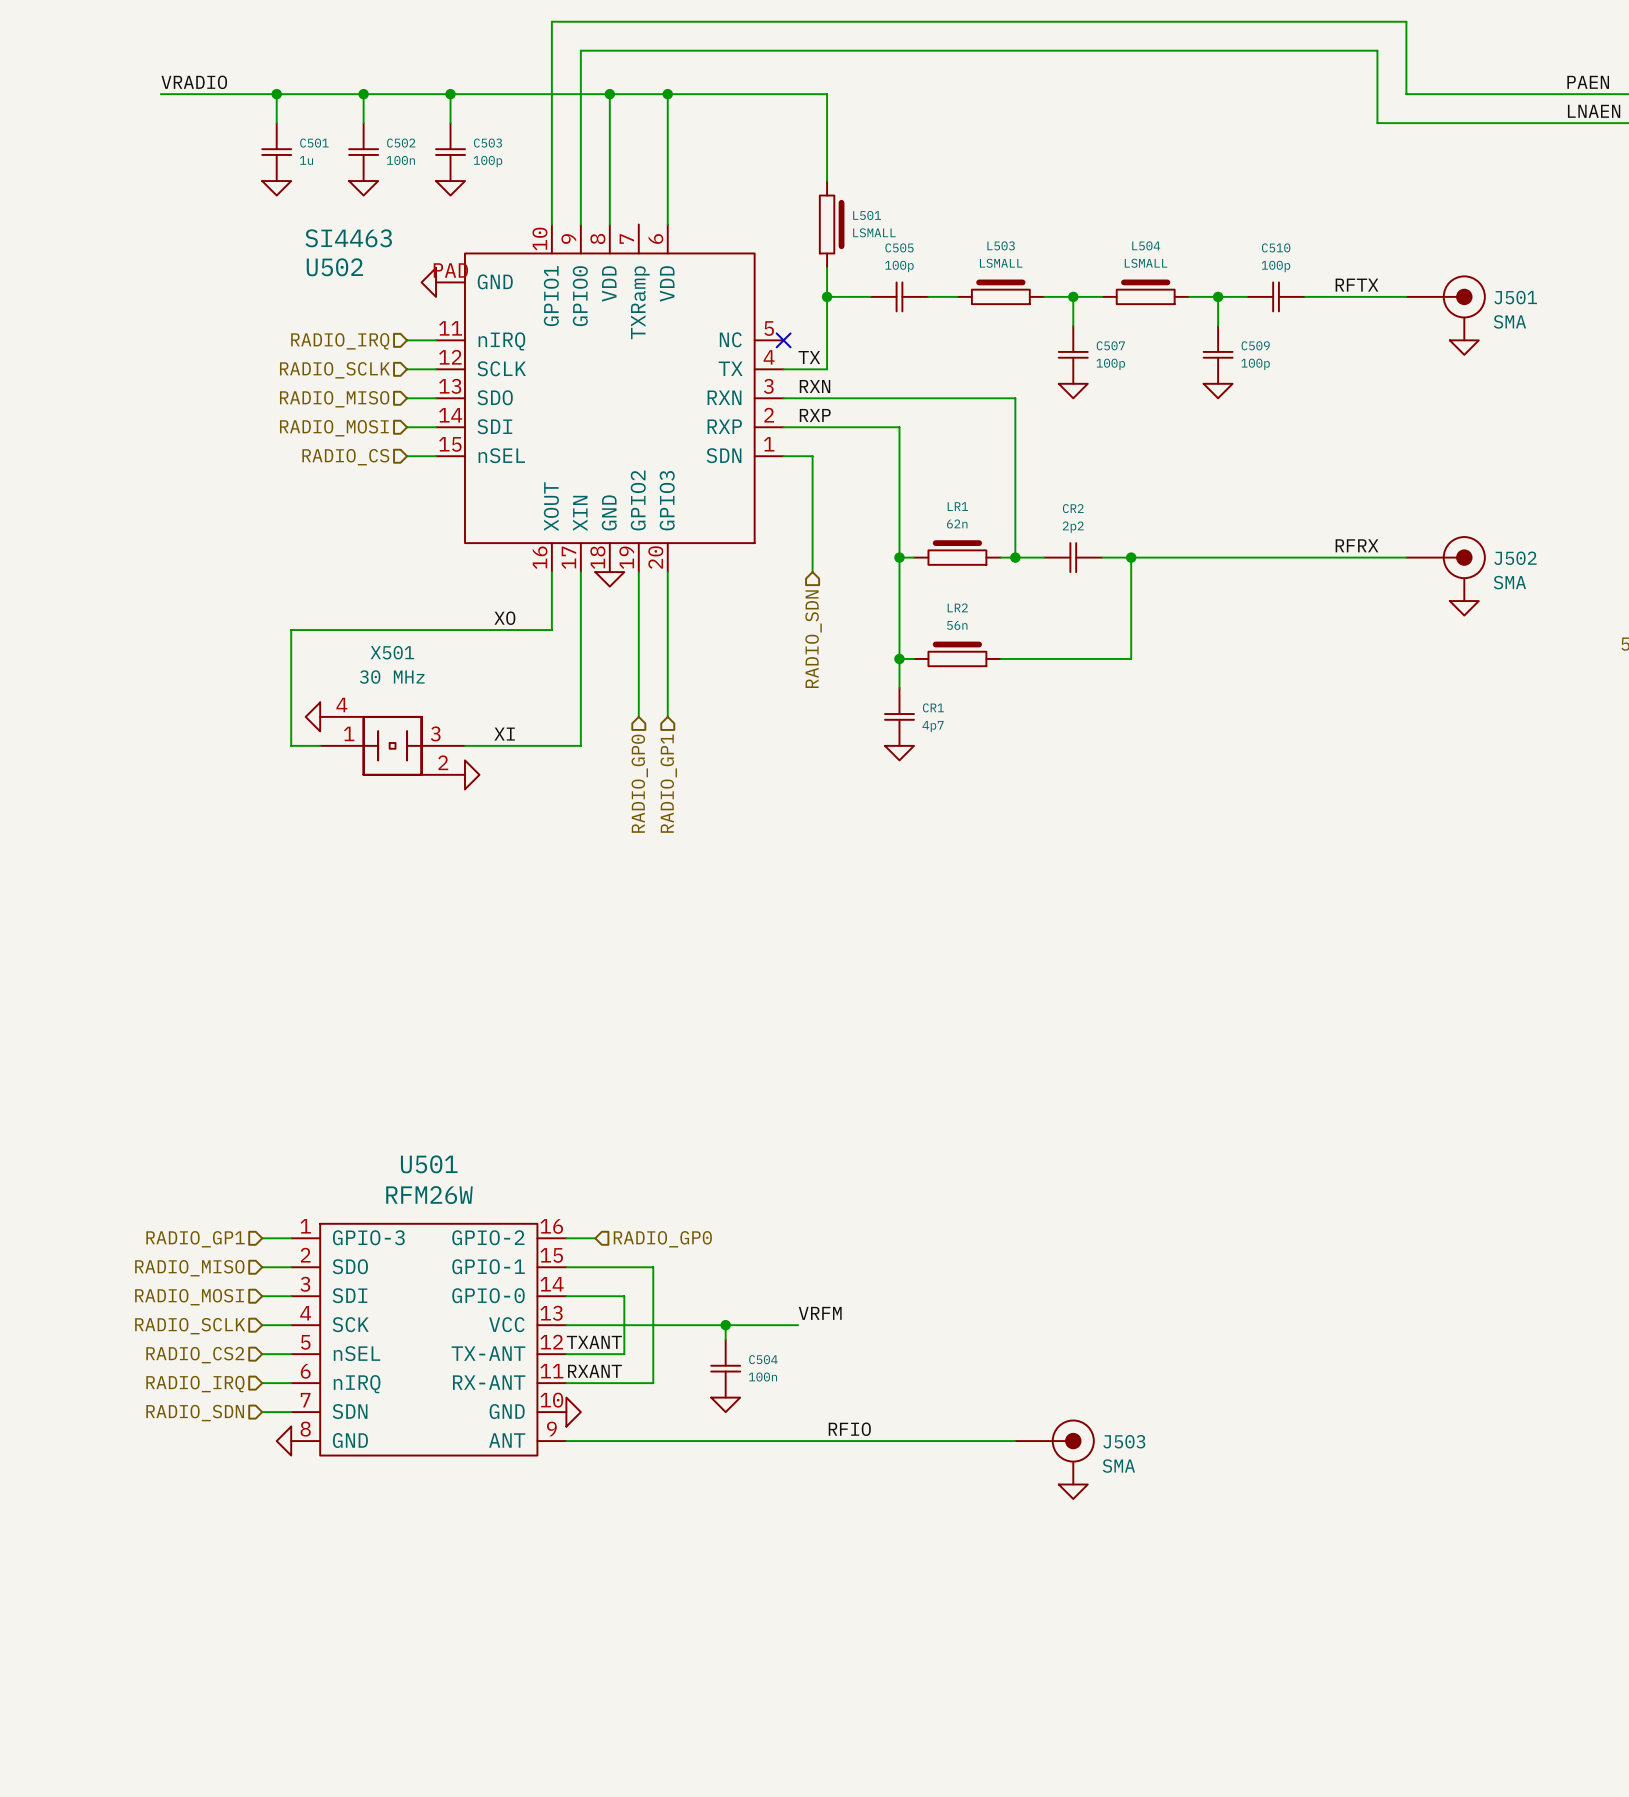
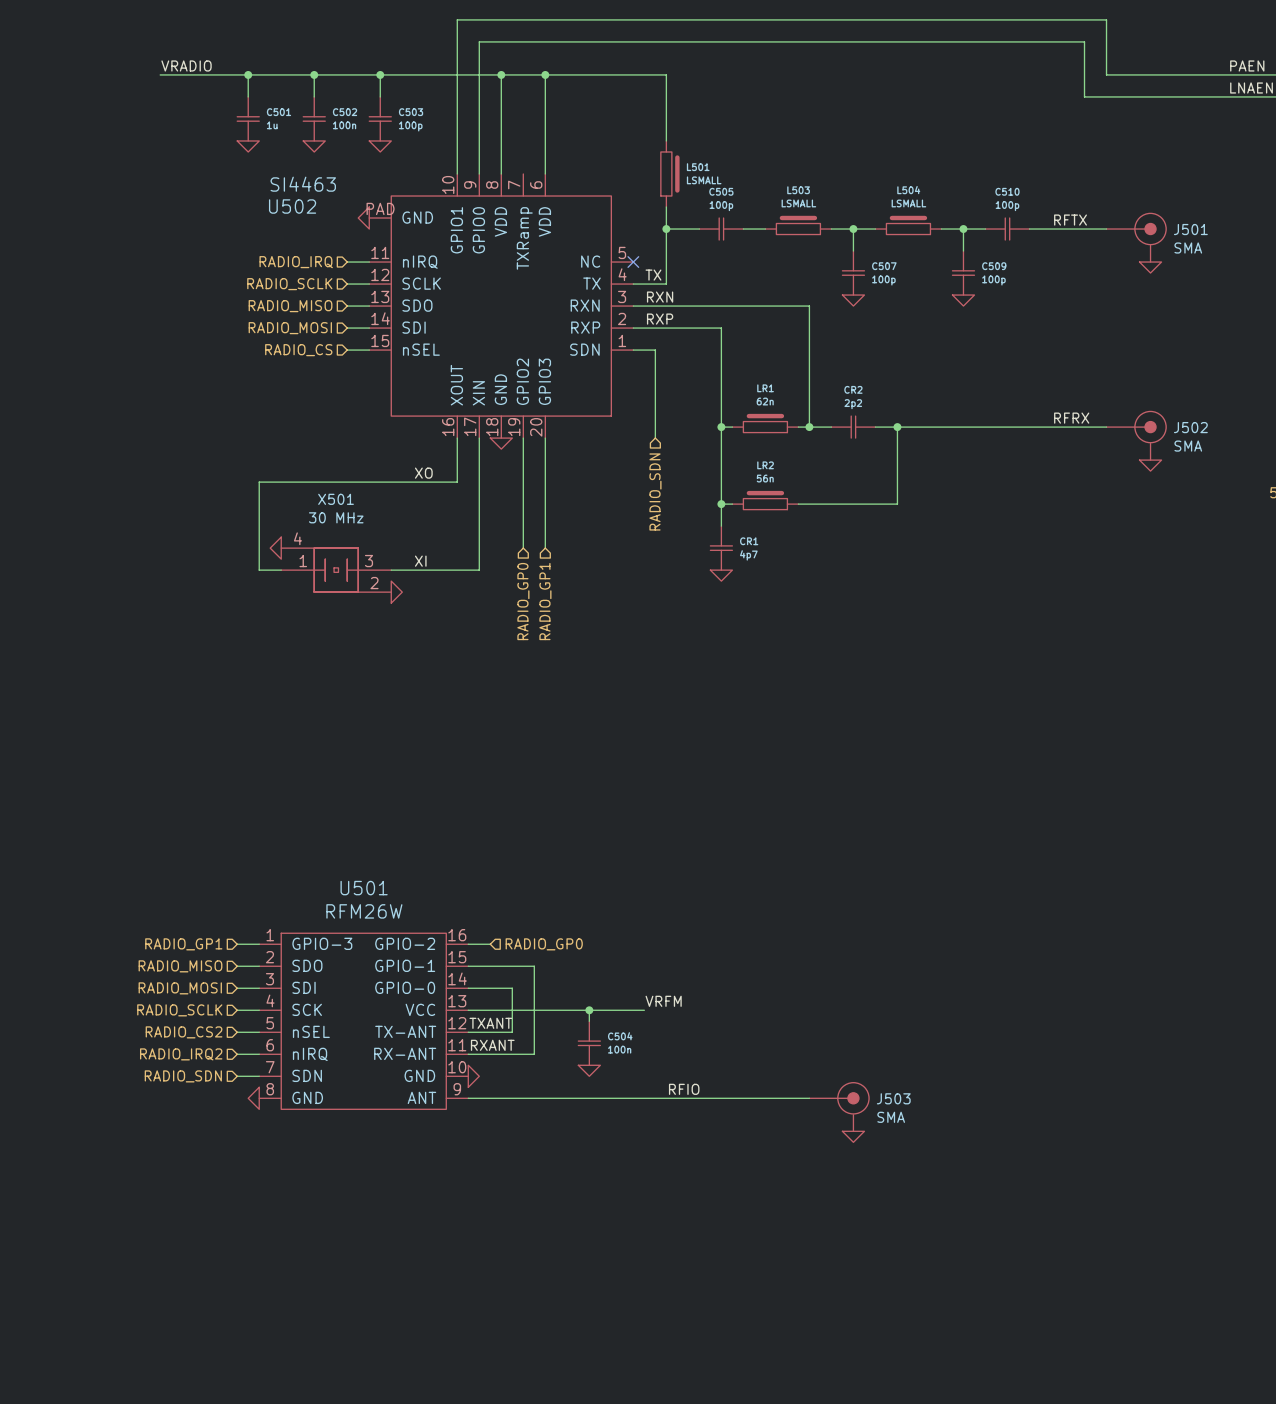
hierarchical label: RADIO_IRQ (195, 1384) -> RADIO_IRQ2 (181, 1054)

